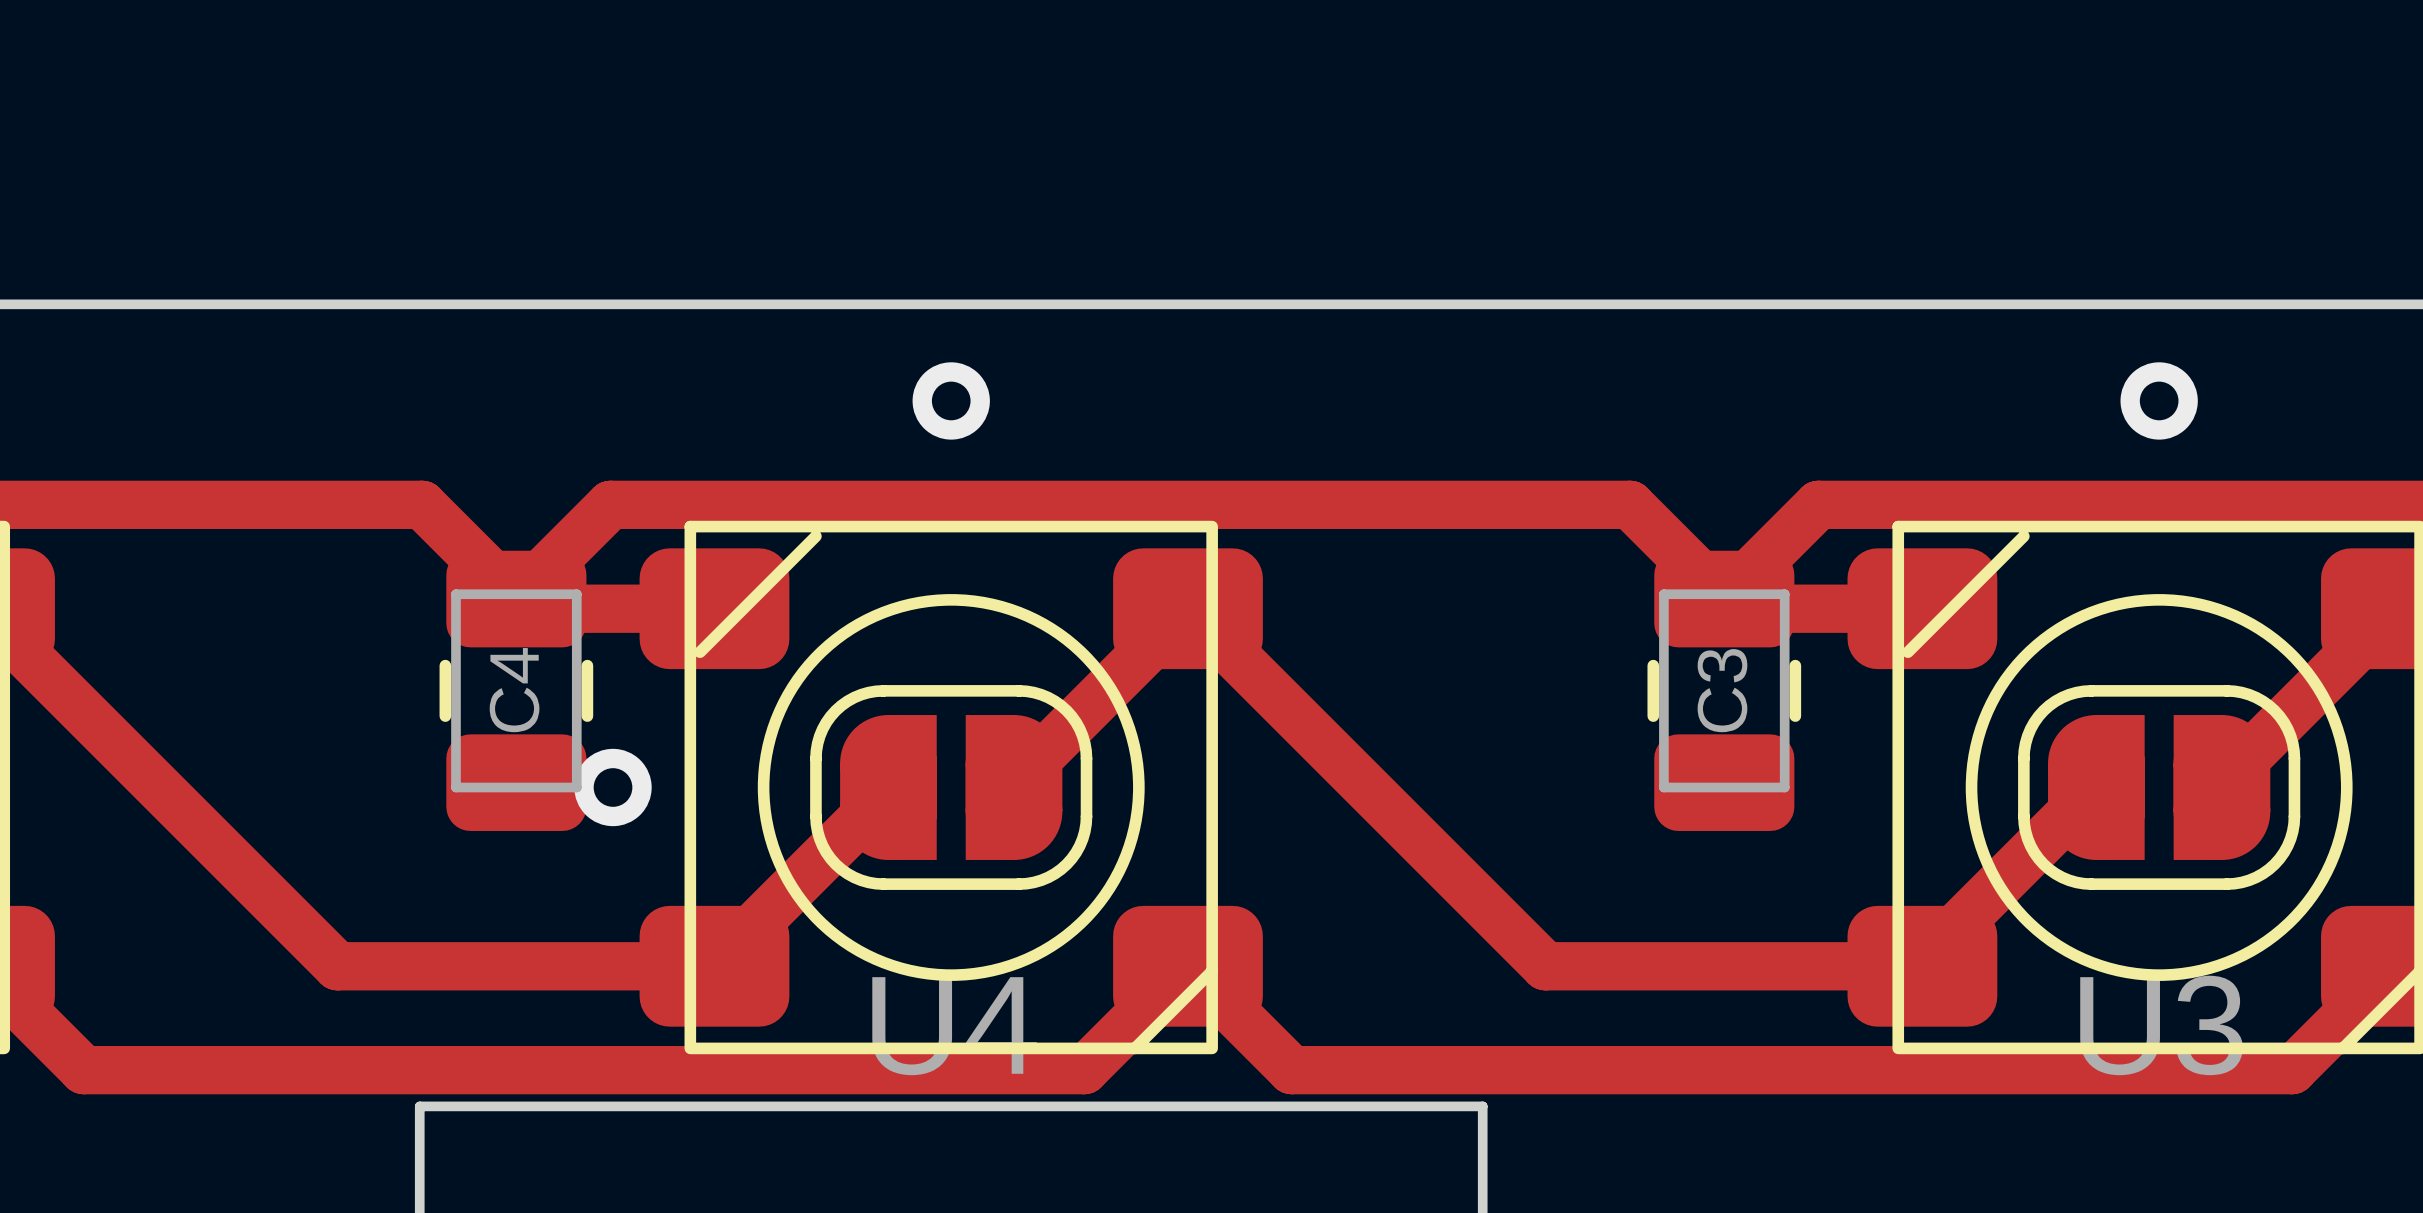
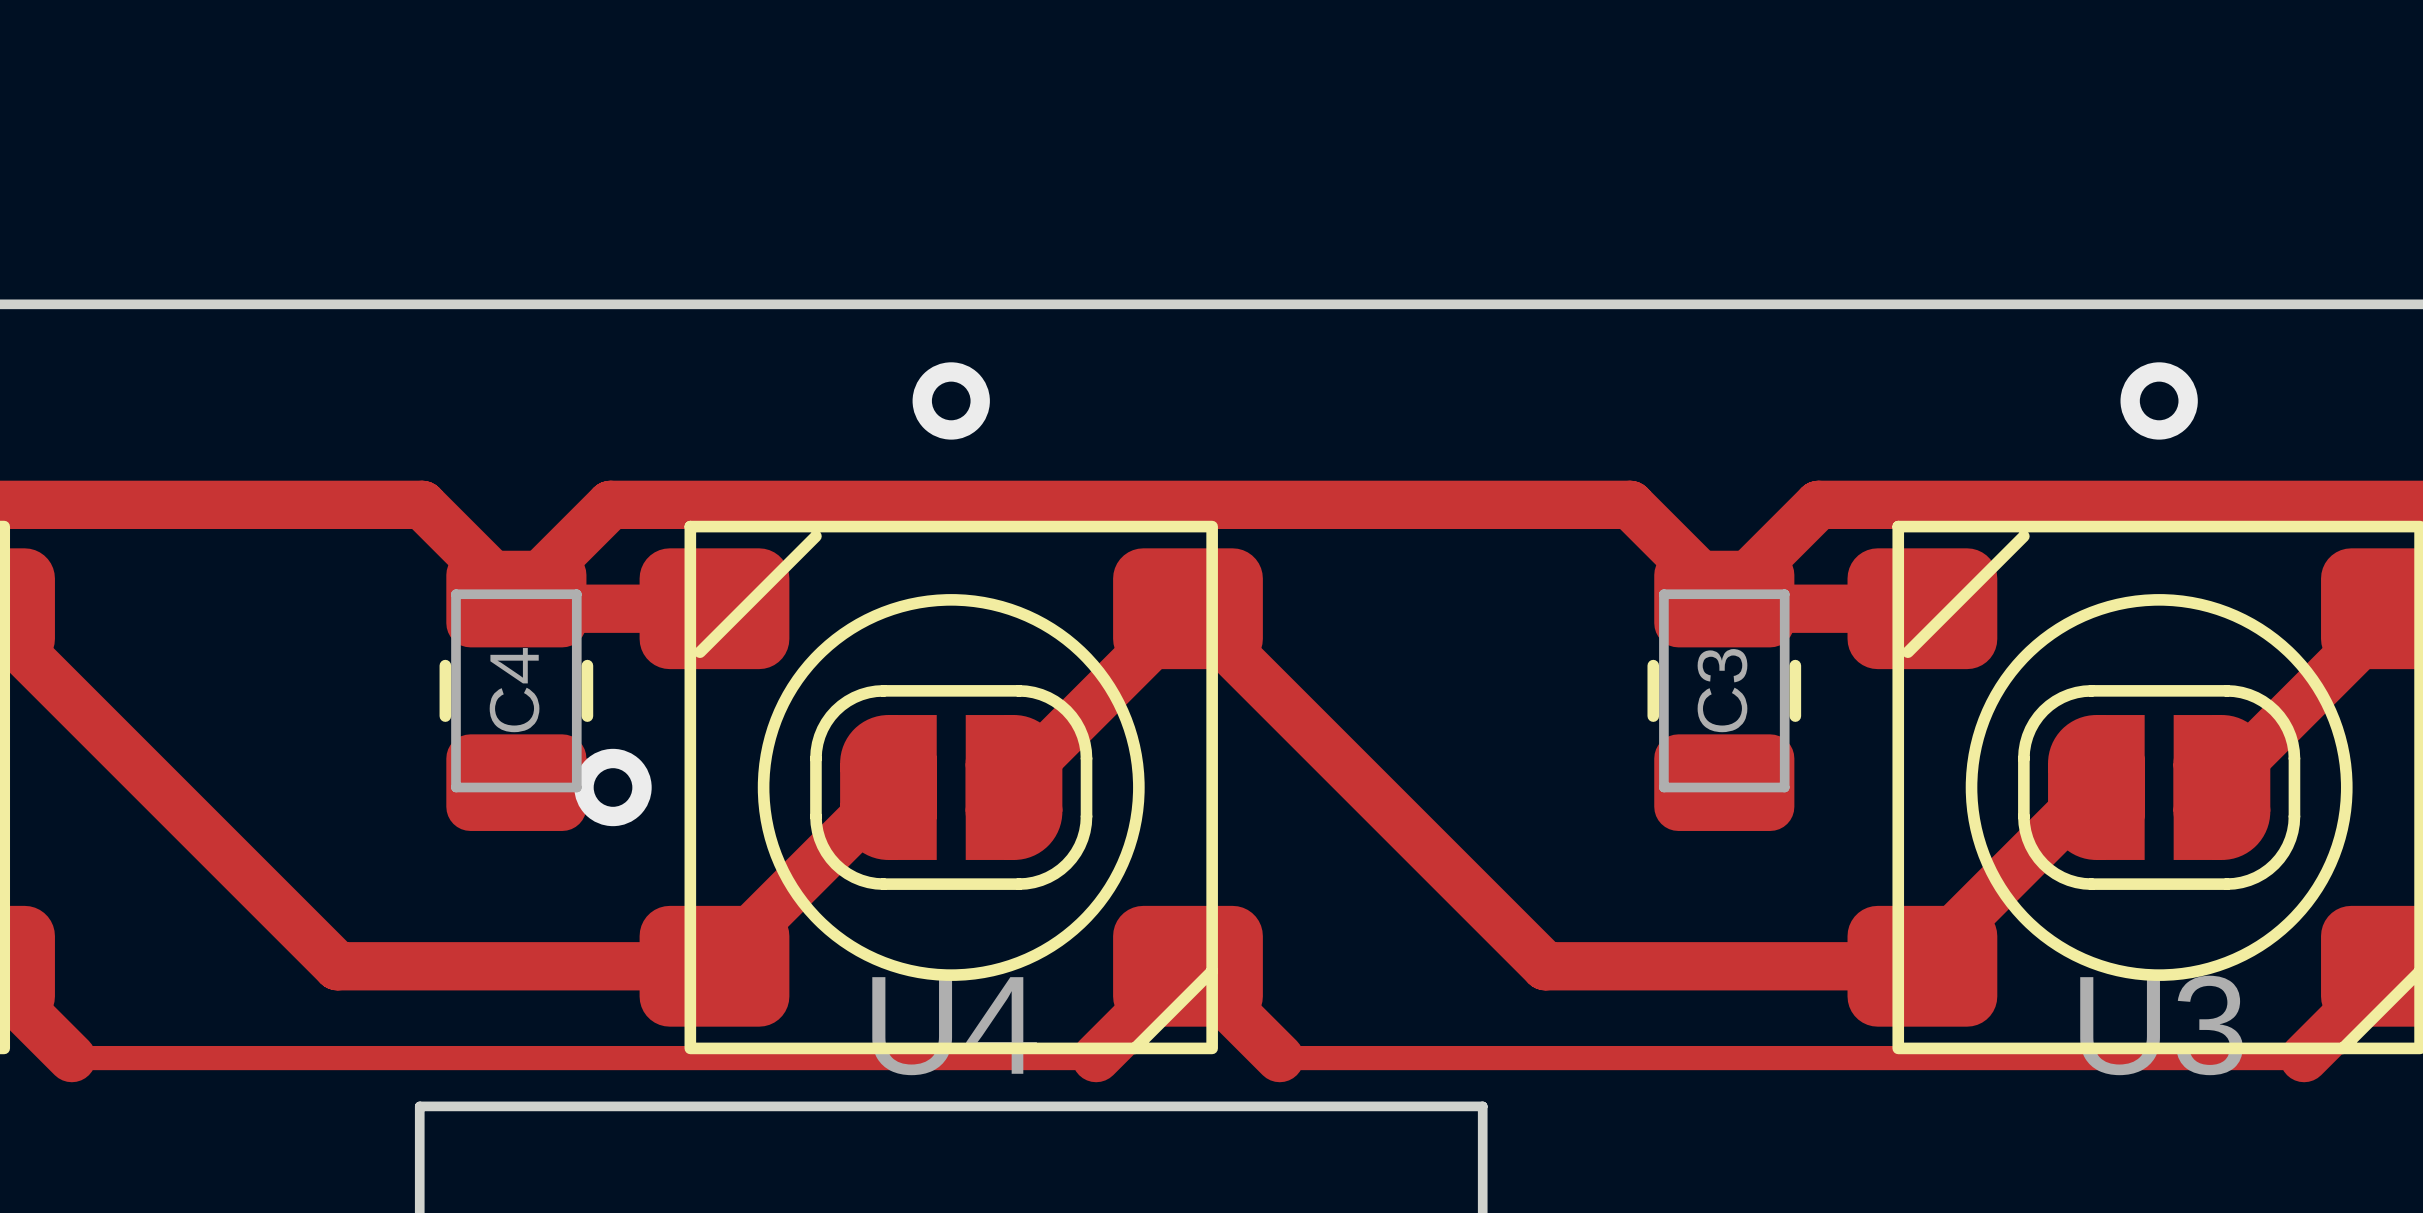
track: (71, 1058) (83, 1070) (1084, 1070) (1096, 1058) -> (71, 1058) (1096, 1058)
track: (1279, 1058) (1291, 1070) (2292, 1070) (2304, 1058) -> (1279, 1058) (2304, 1058)

